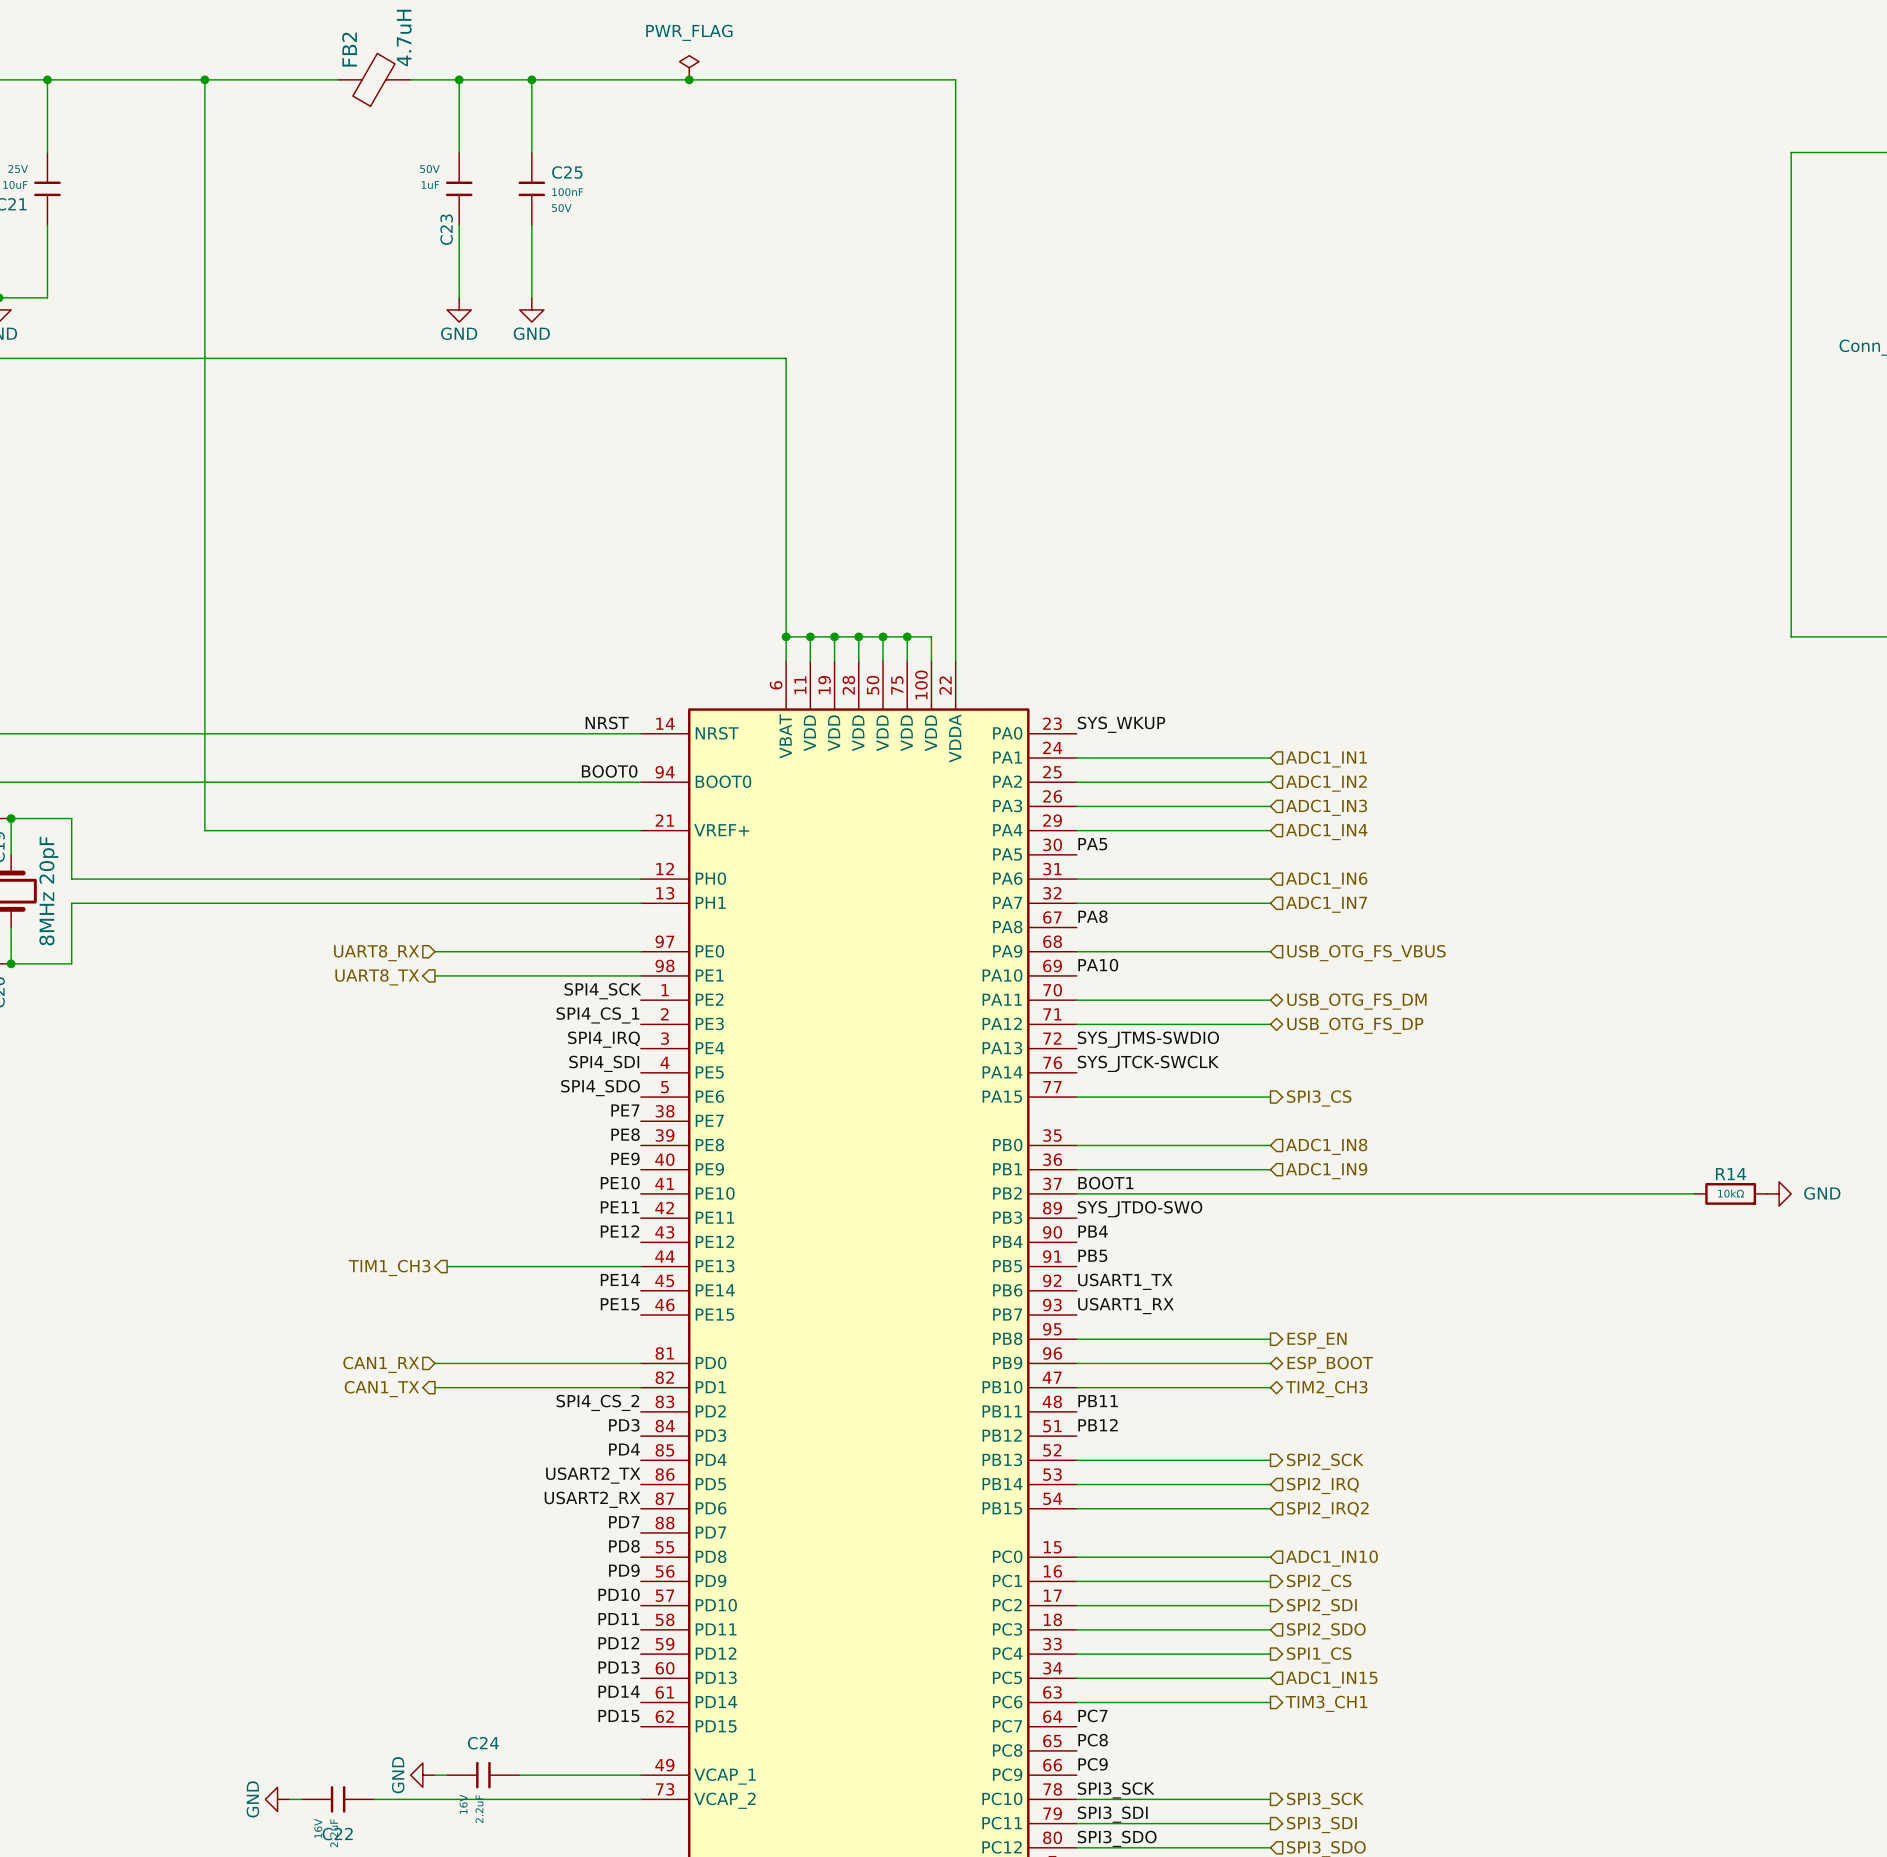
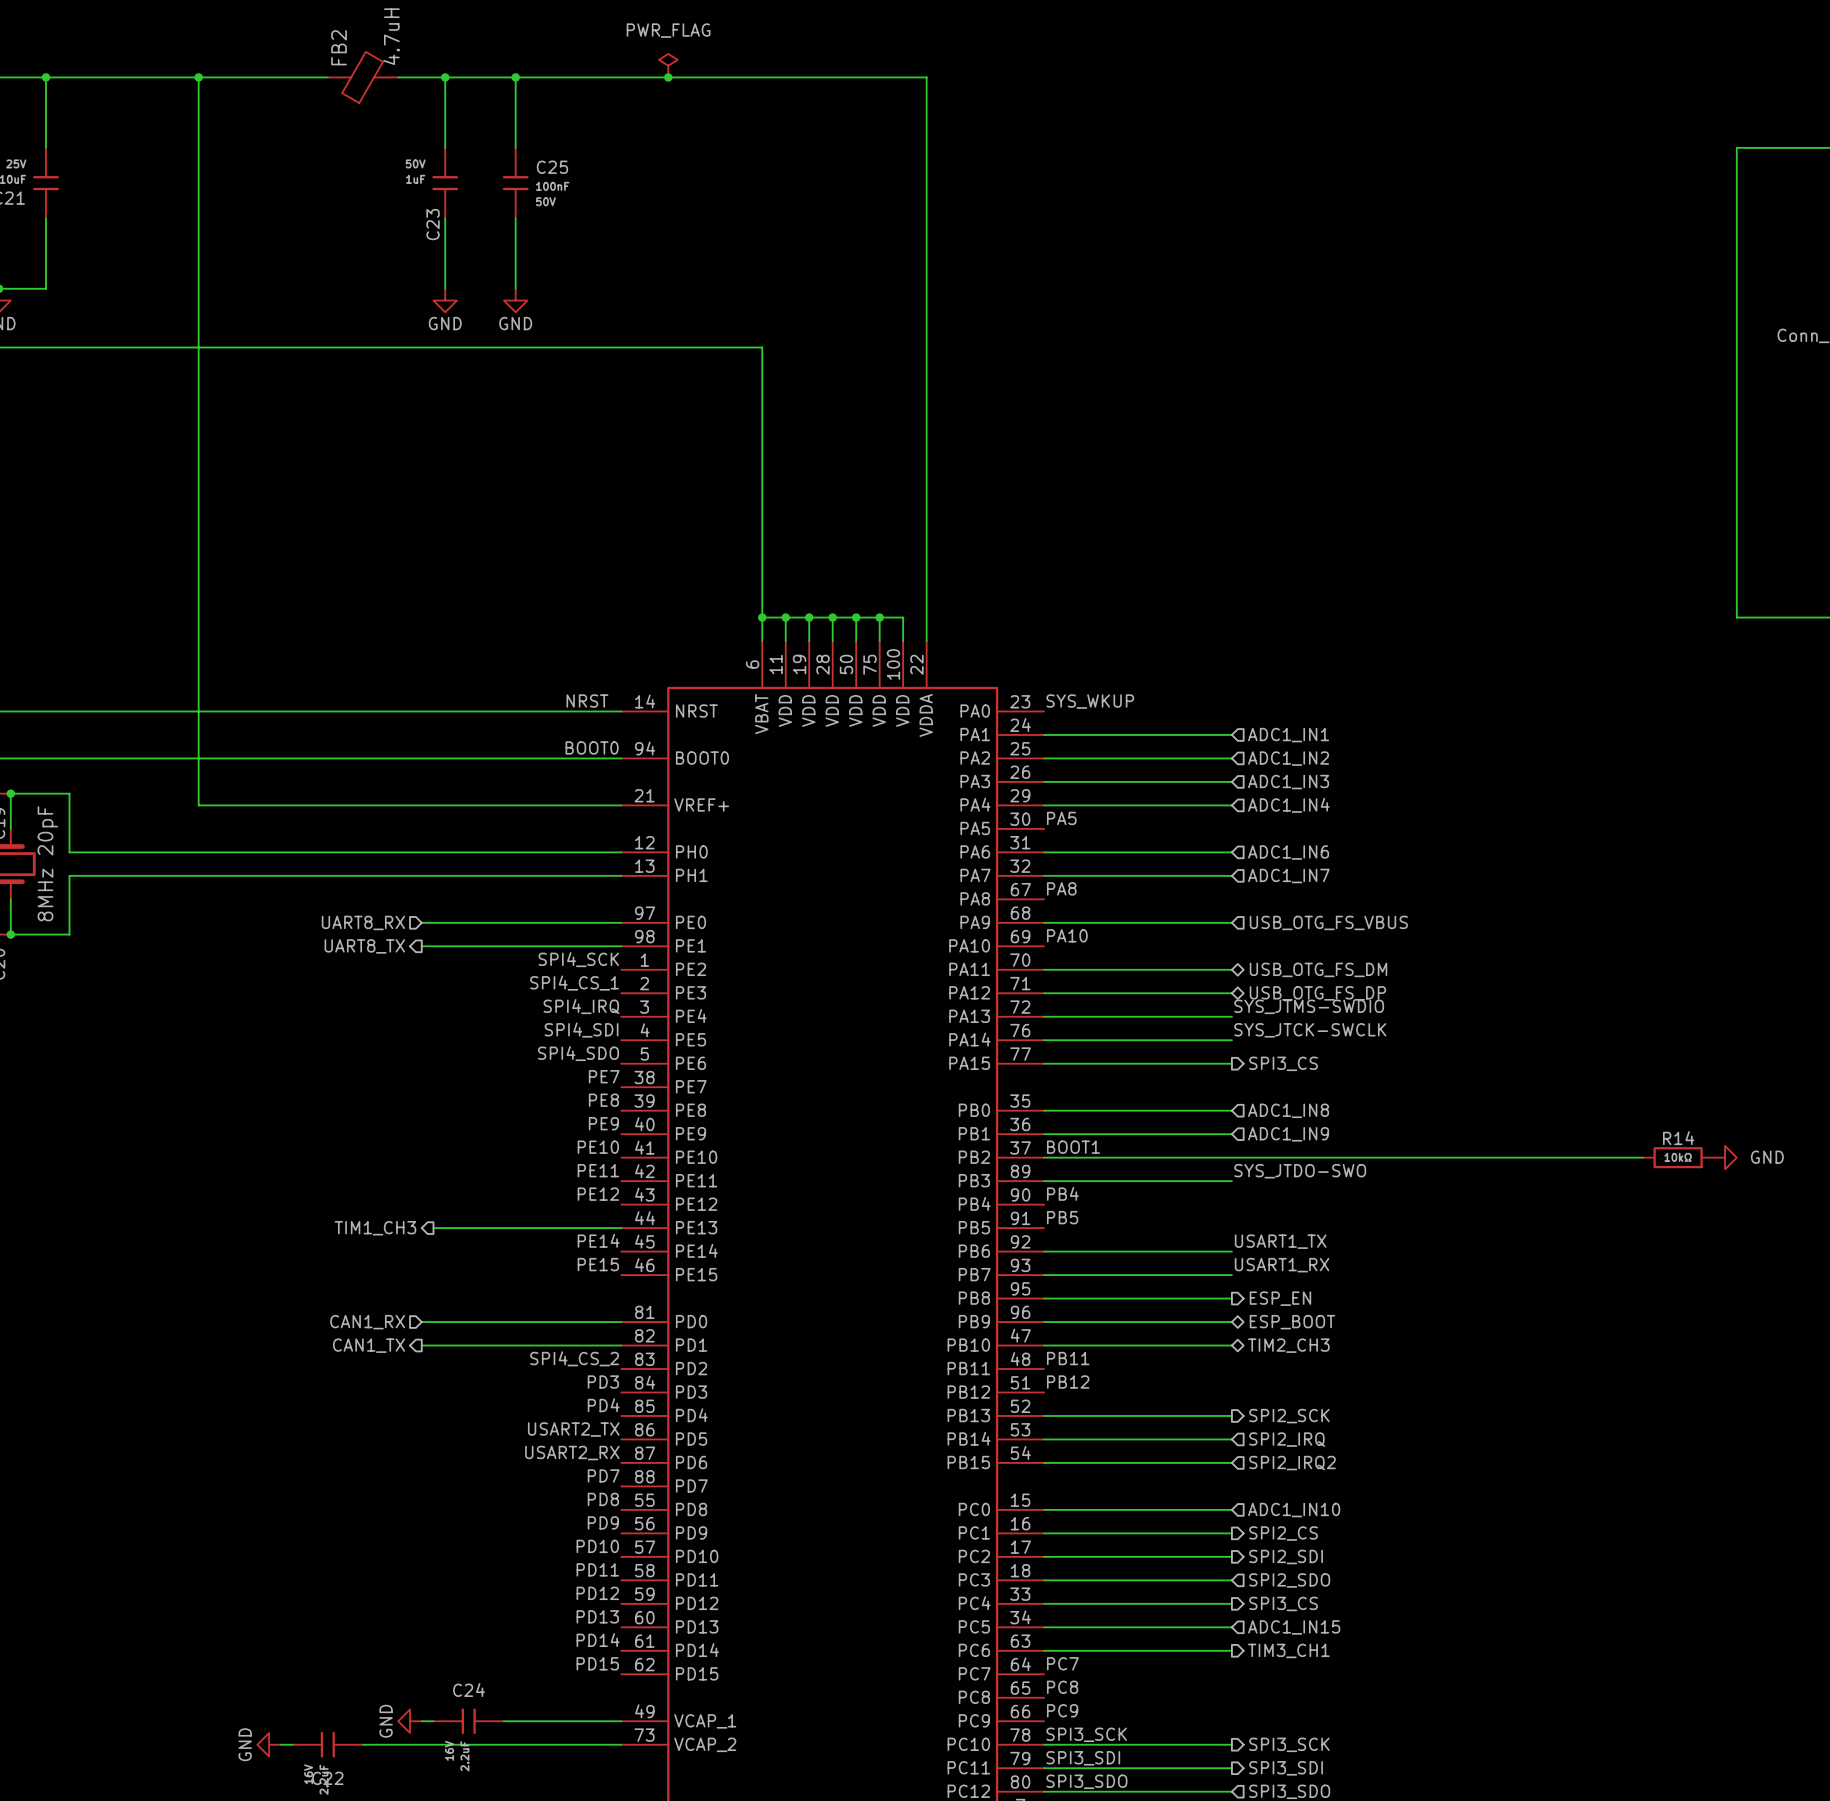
label position: SYS_JTMS-SWDIO (1148, 1039) -> SYS_JTMS-SWDIO (1309, 1006)
wire: none -> (1044, 1016) (1231, 1016)
label position: SYS_JTCK-SWCLK (1148, 1063) -> SYS_JTCK-SWCLK (1310, 1030)
wire: none -> (1044, 1040) (1231, 1040)
label position: SYS_JTDO-SWO (1140, 1209) -> SYS_JTDO-SWO (1300, 1171)
wire: none -> (1044, 1181) (1231, 1181)
label position: USART1_TX (1125, 1281) -> USART1_TX (1280, 1241)
wire: none -> (1044, 1251) (1231, 1251)
label position: USART1_RX (1125, 1306) -> USART1_RX (1282, 1265)
wire: none -> (1044, 1275) (1231, 1275)
hierarchical label: SPI1_CS (1319, 1655) -> SPI3_CS (1283, 1603)

